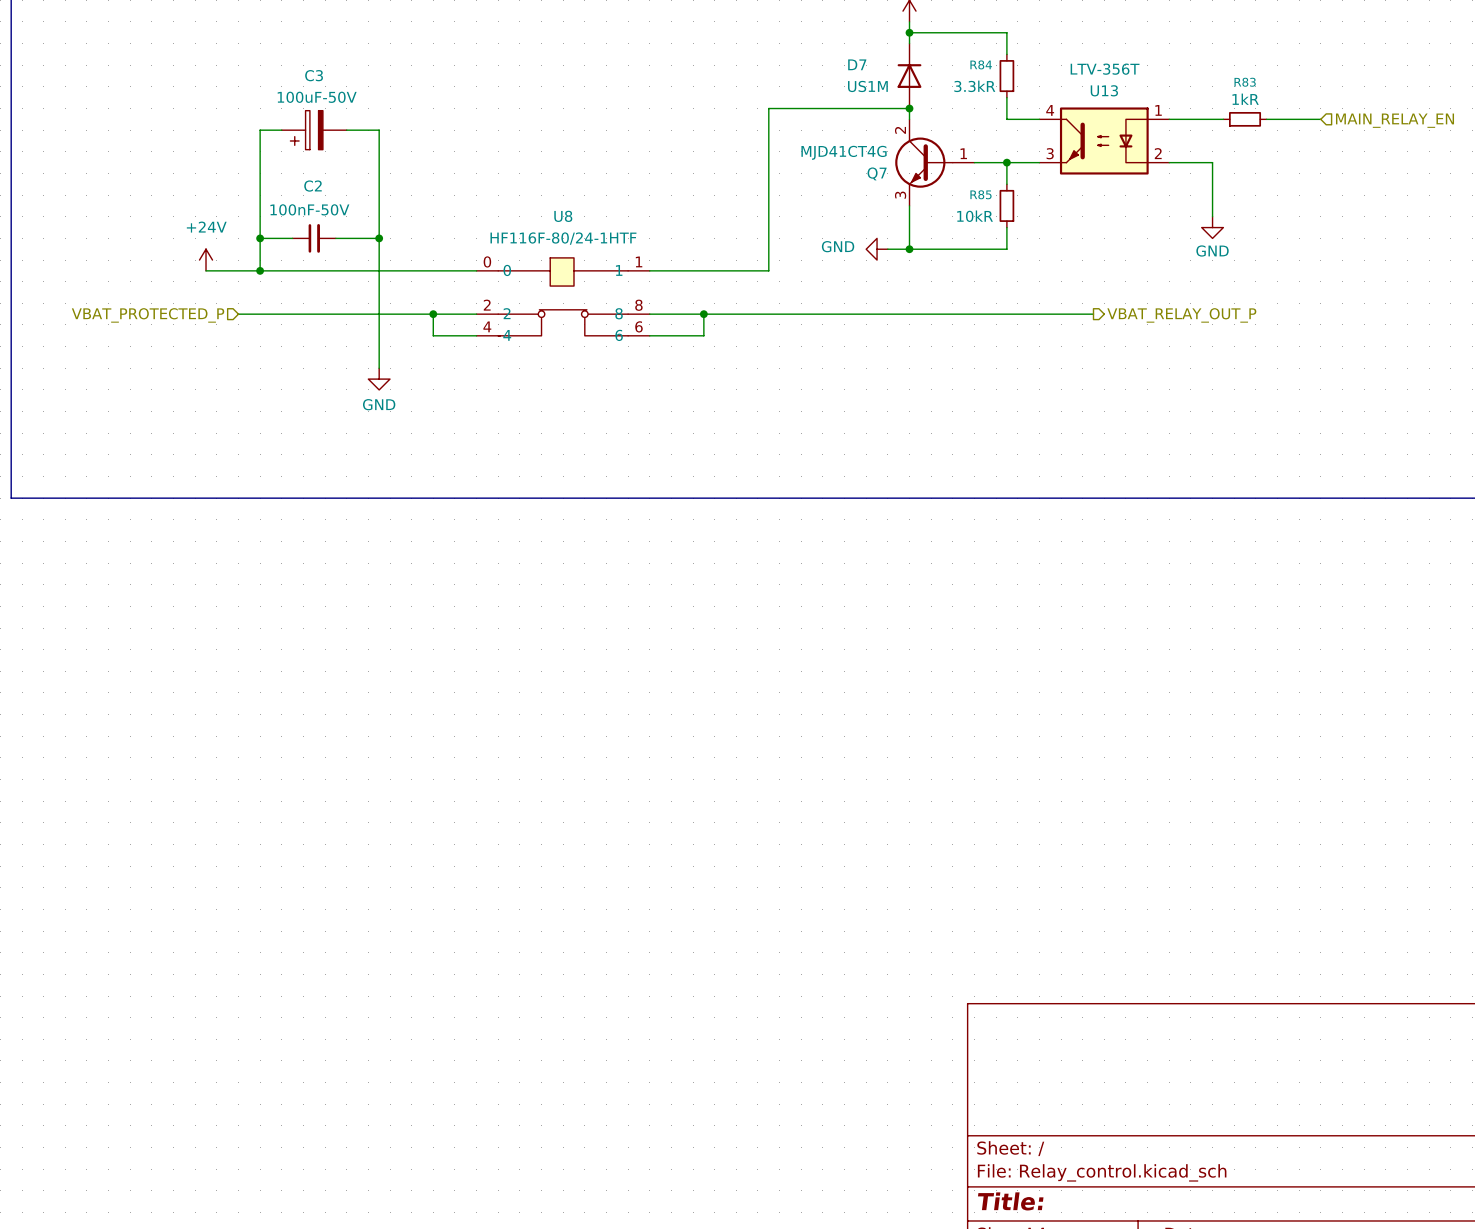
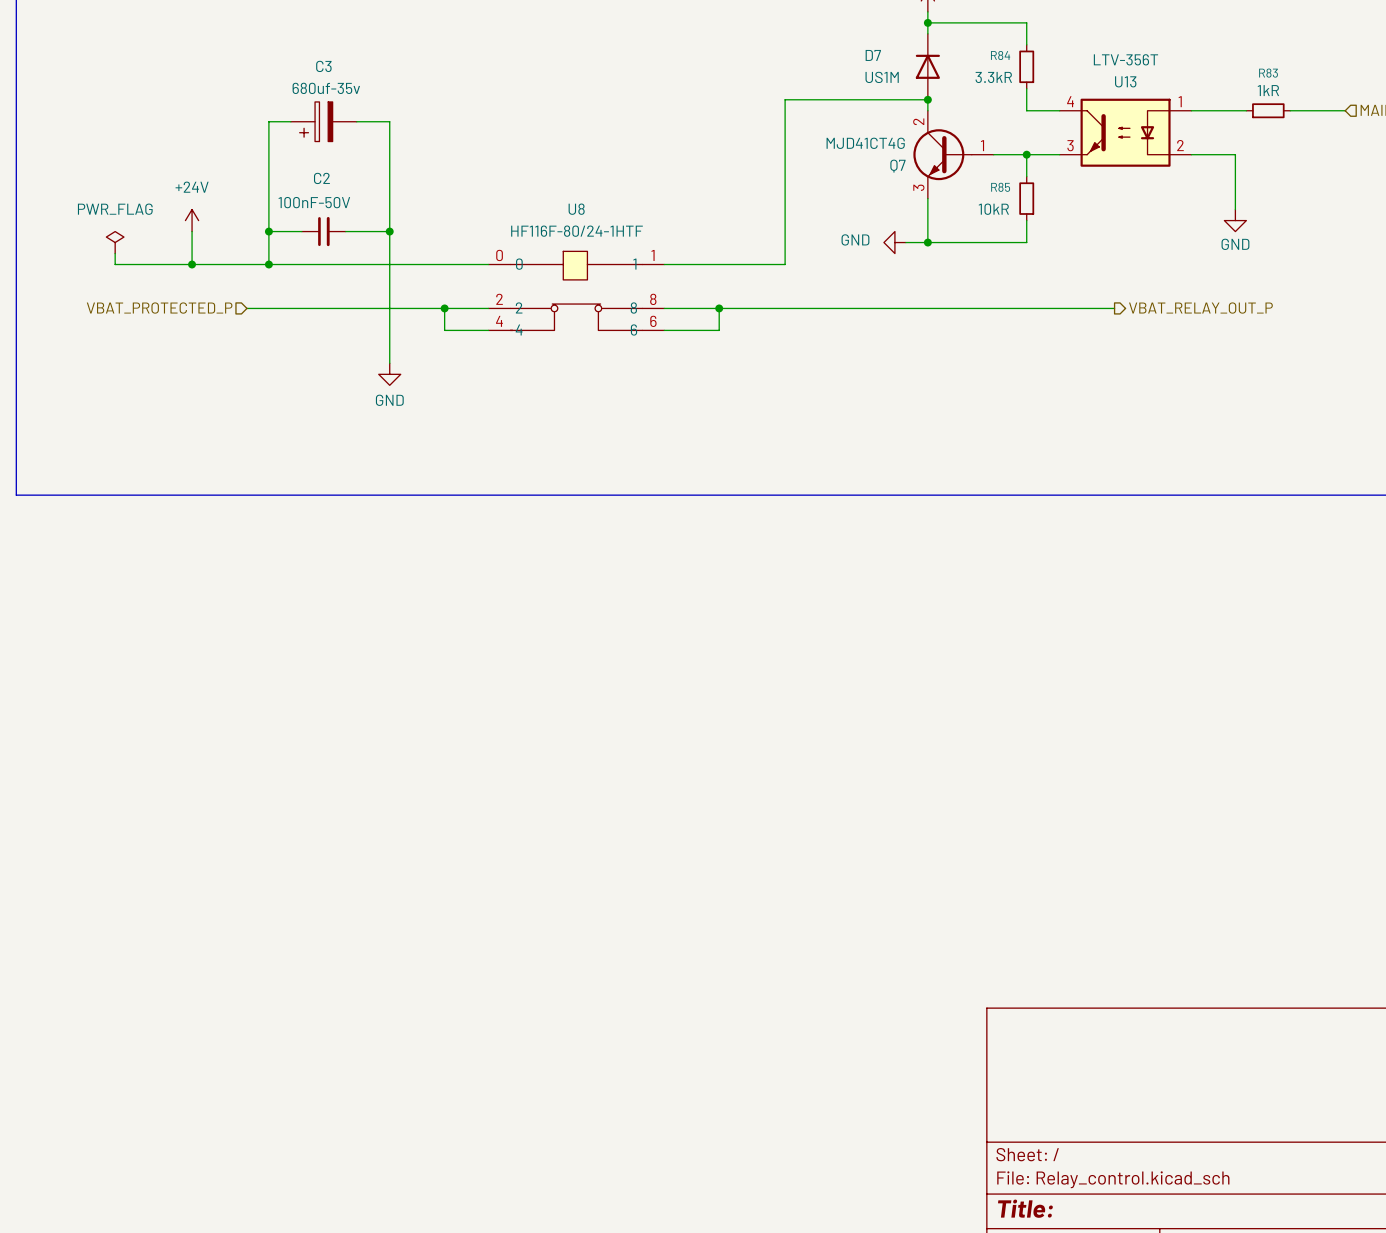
C3 value: 100uF-50V (317, 97) -> 680uf-35v (326, 88)
wire: none -> (192, 231) (192, 264)
power symbol: none -> PWR_FLAG (115, 242)
wire: none -> (115, 253) (115, 264) (214, 264)
power symbol position: +24V (206, 260) -> +24V (192, 220)
junction: none -> (192, 264)

